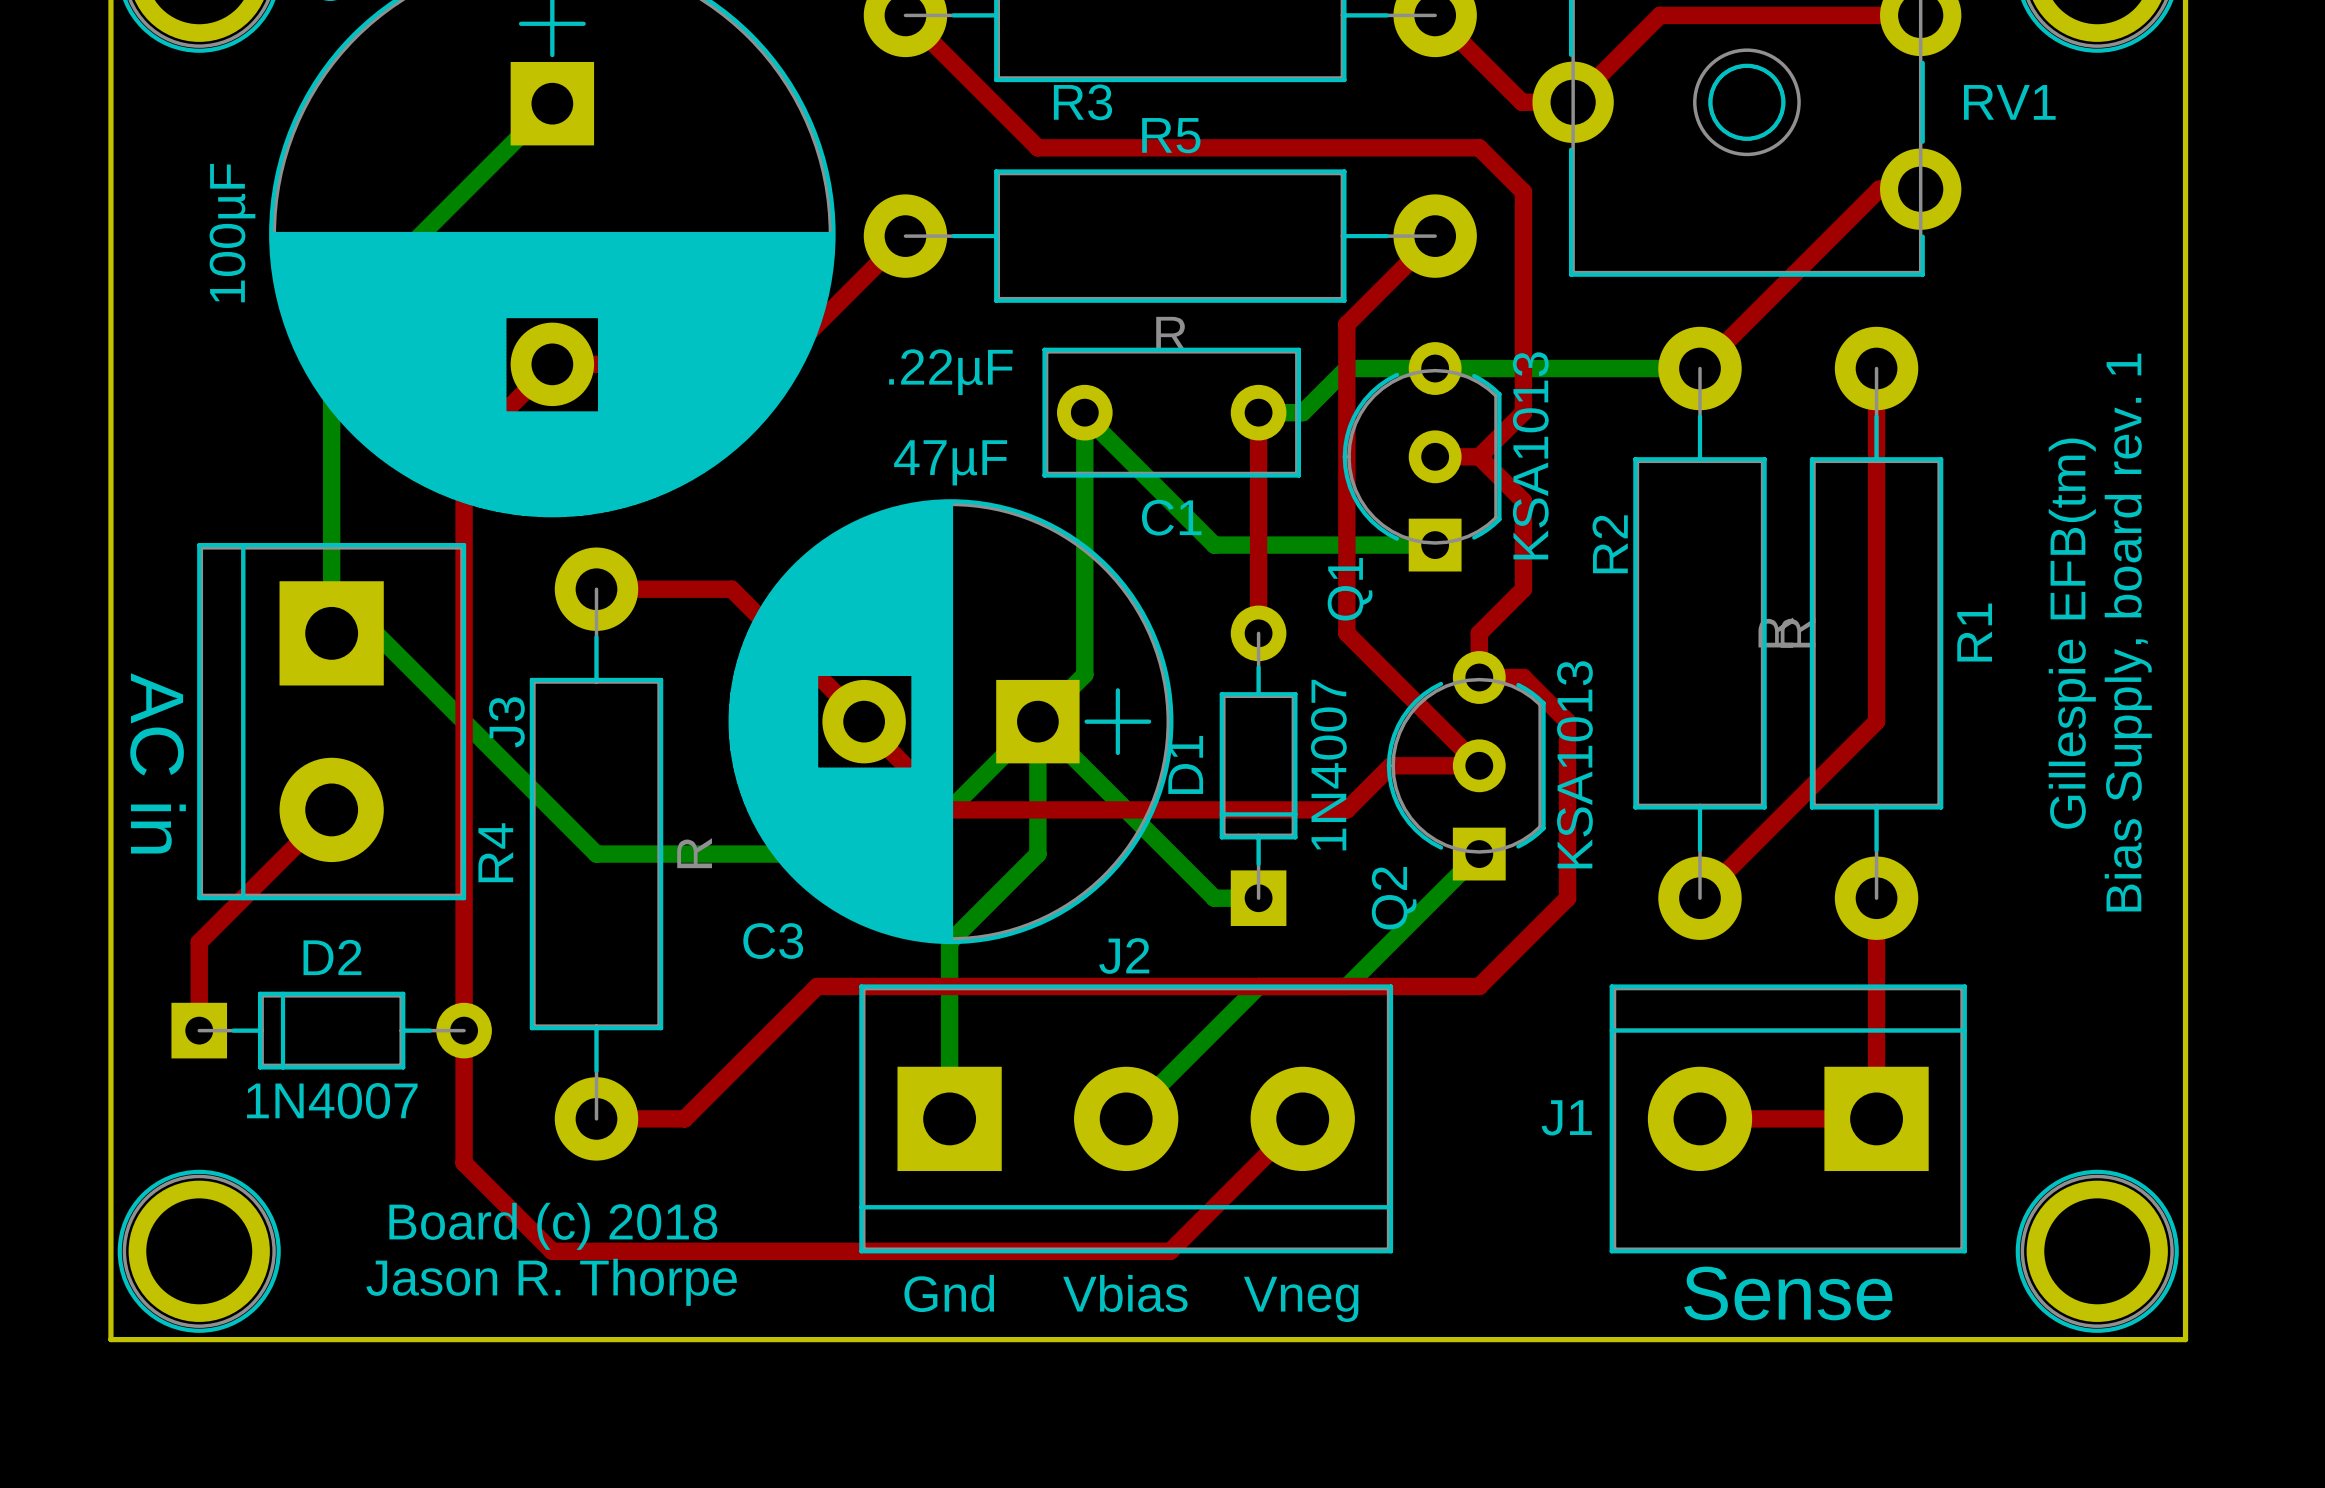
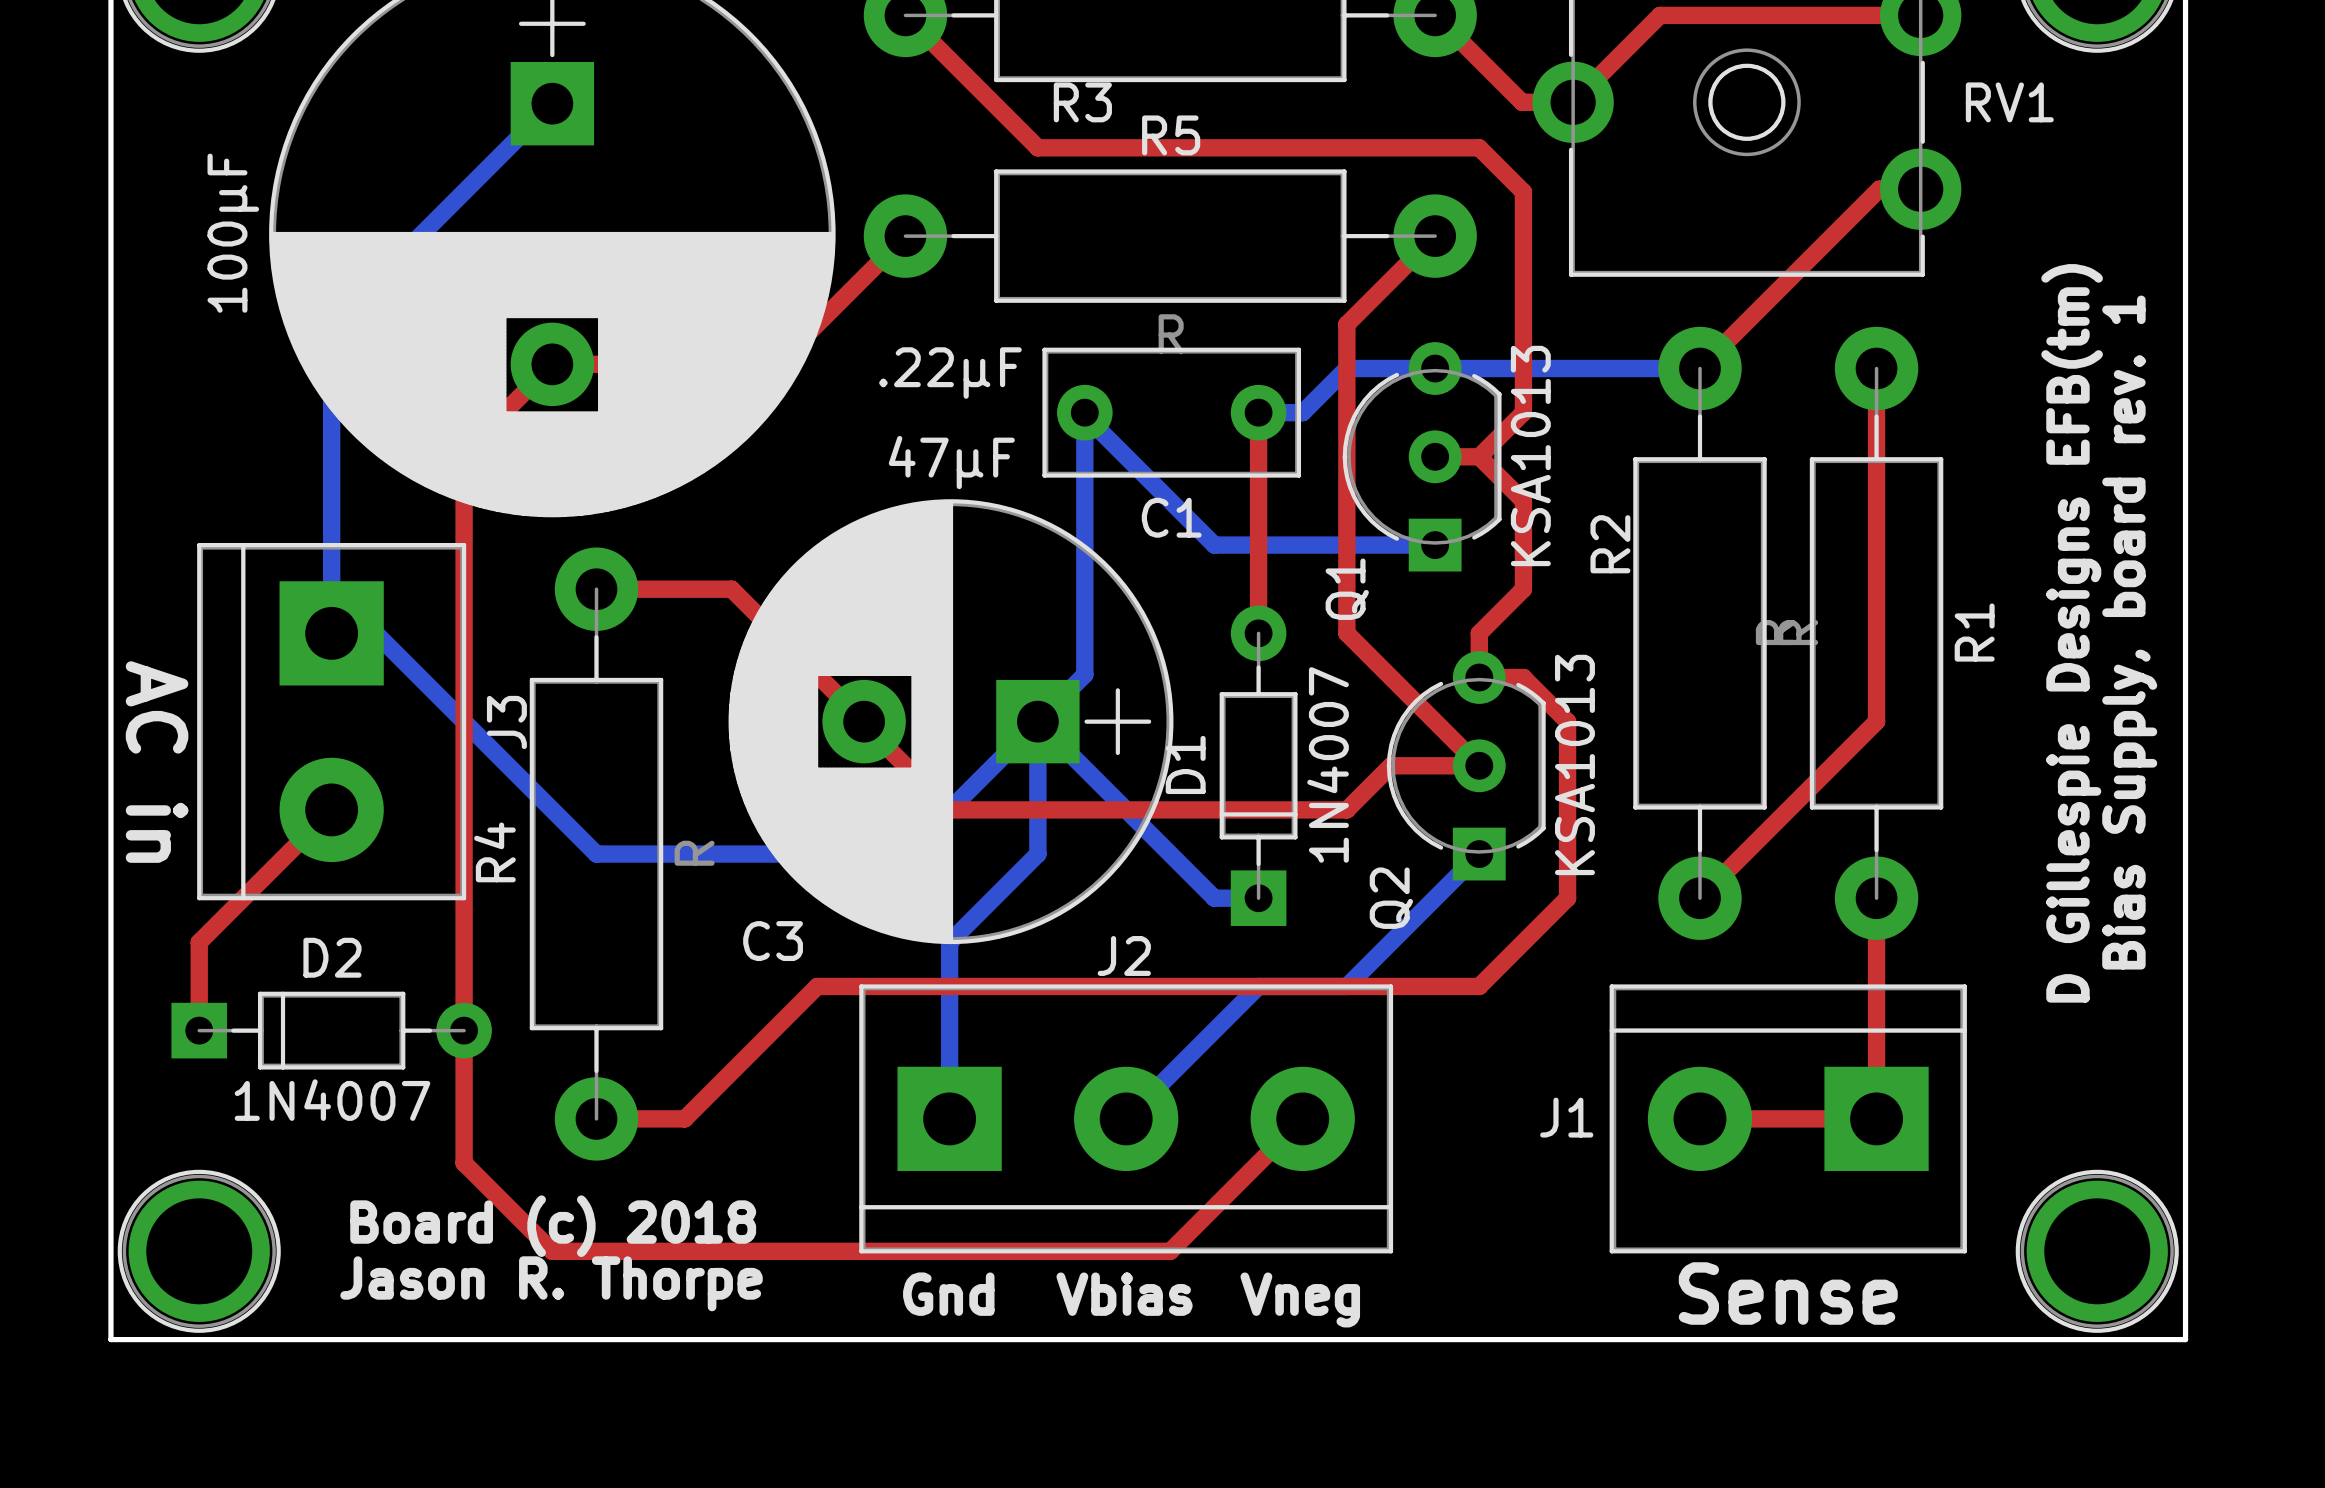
text: Gillespie EFB(tm) (2072, 633) -> D Gillespie Designs EFB(tm) (2072, 633)

